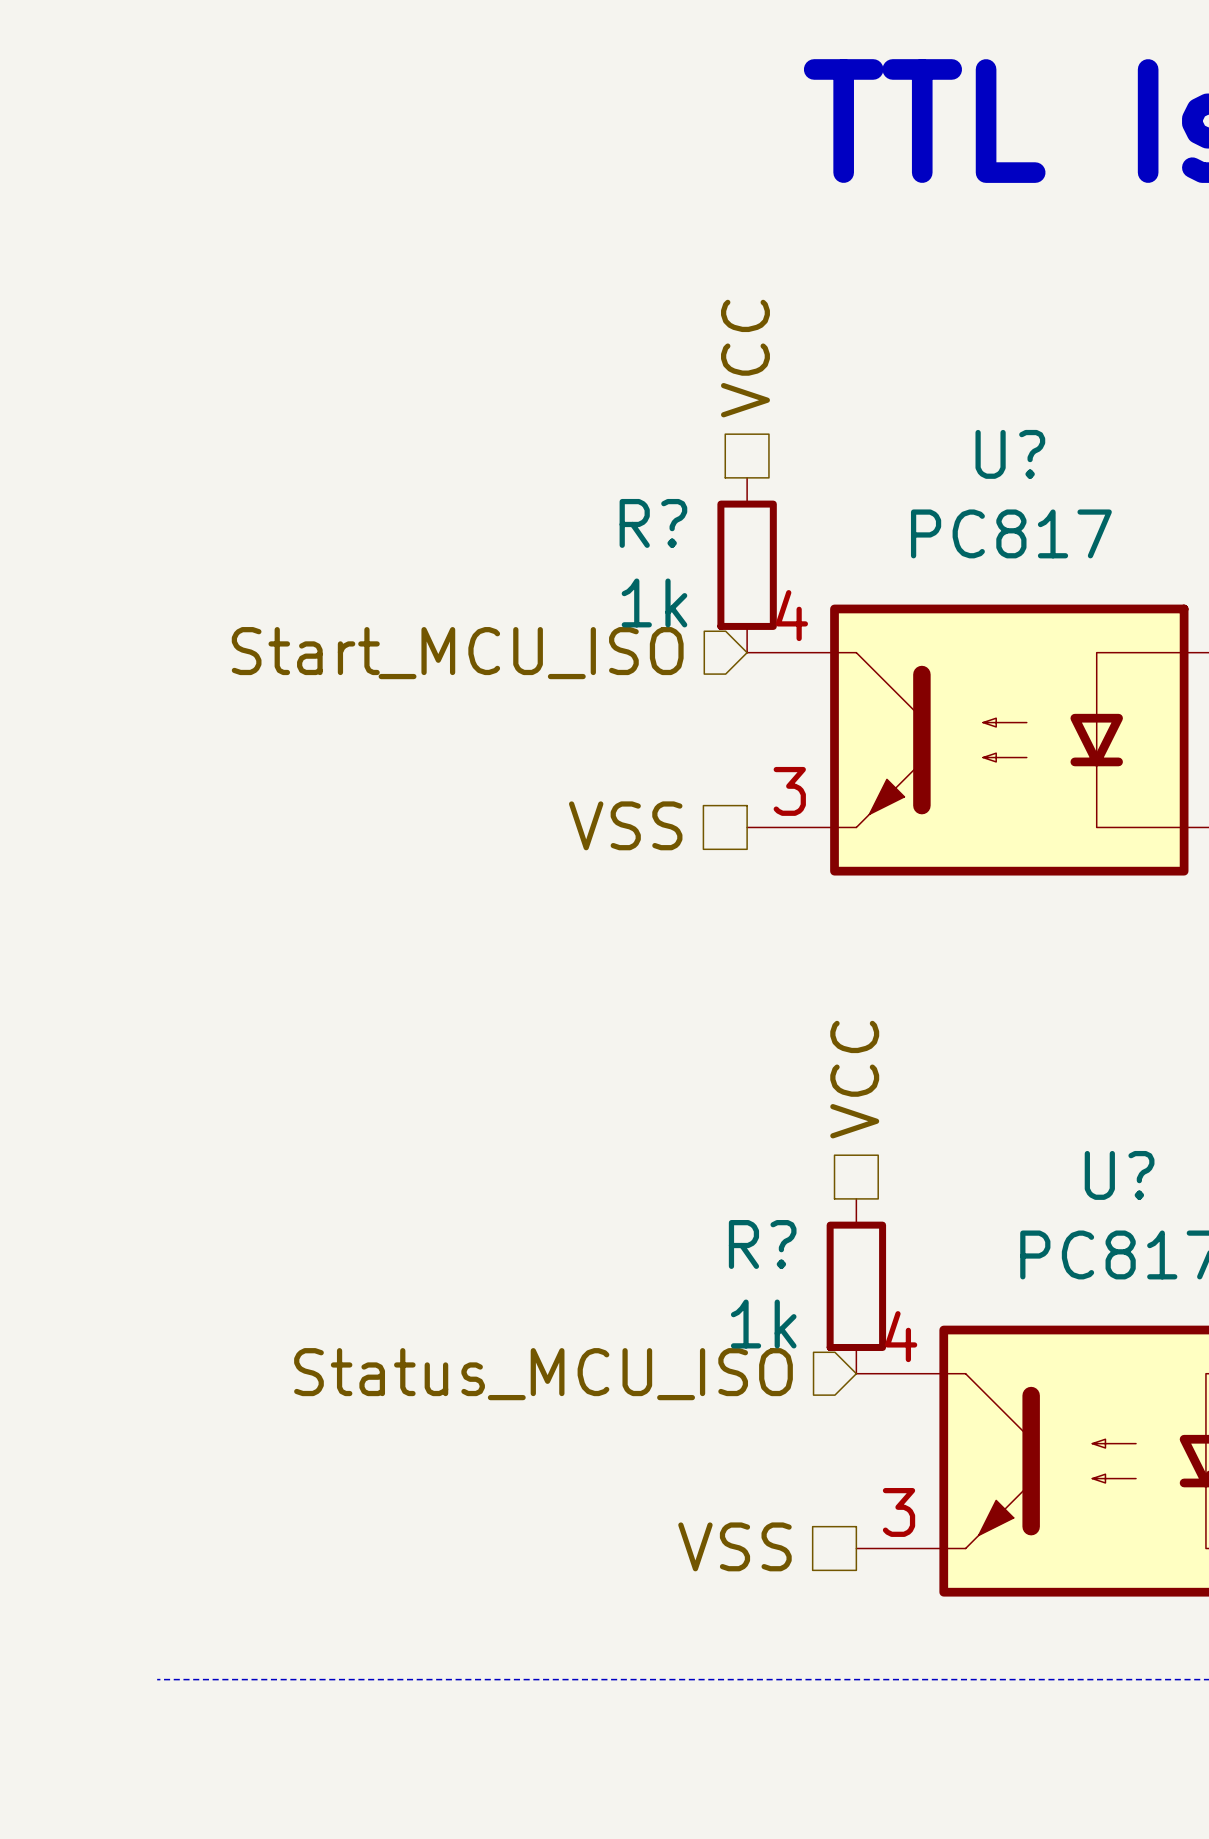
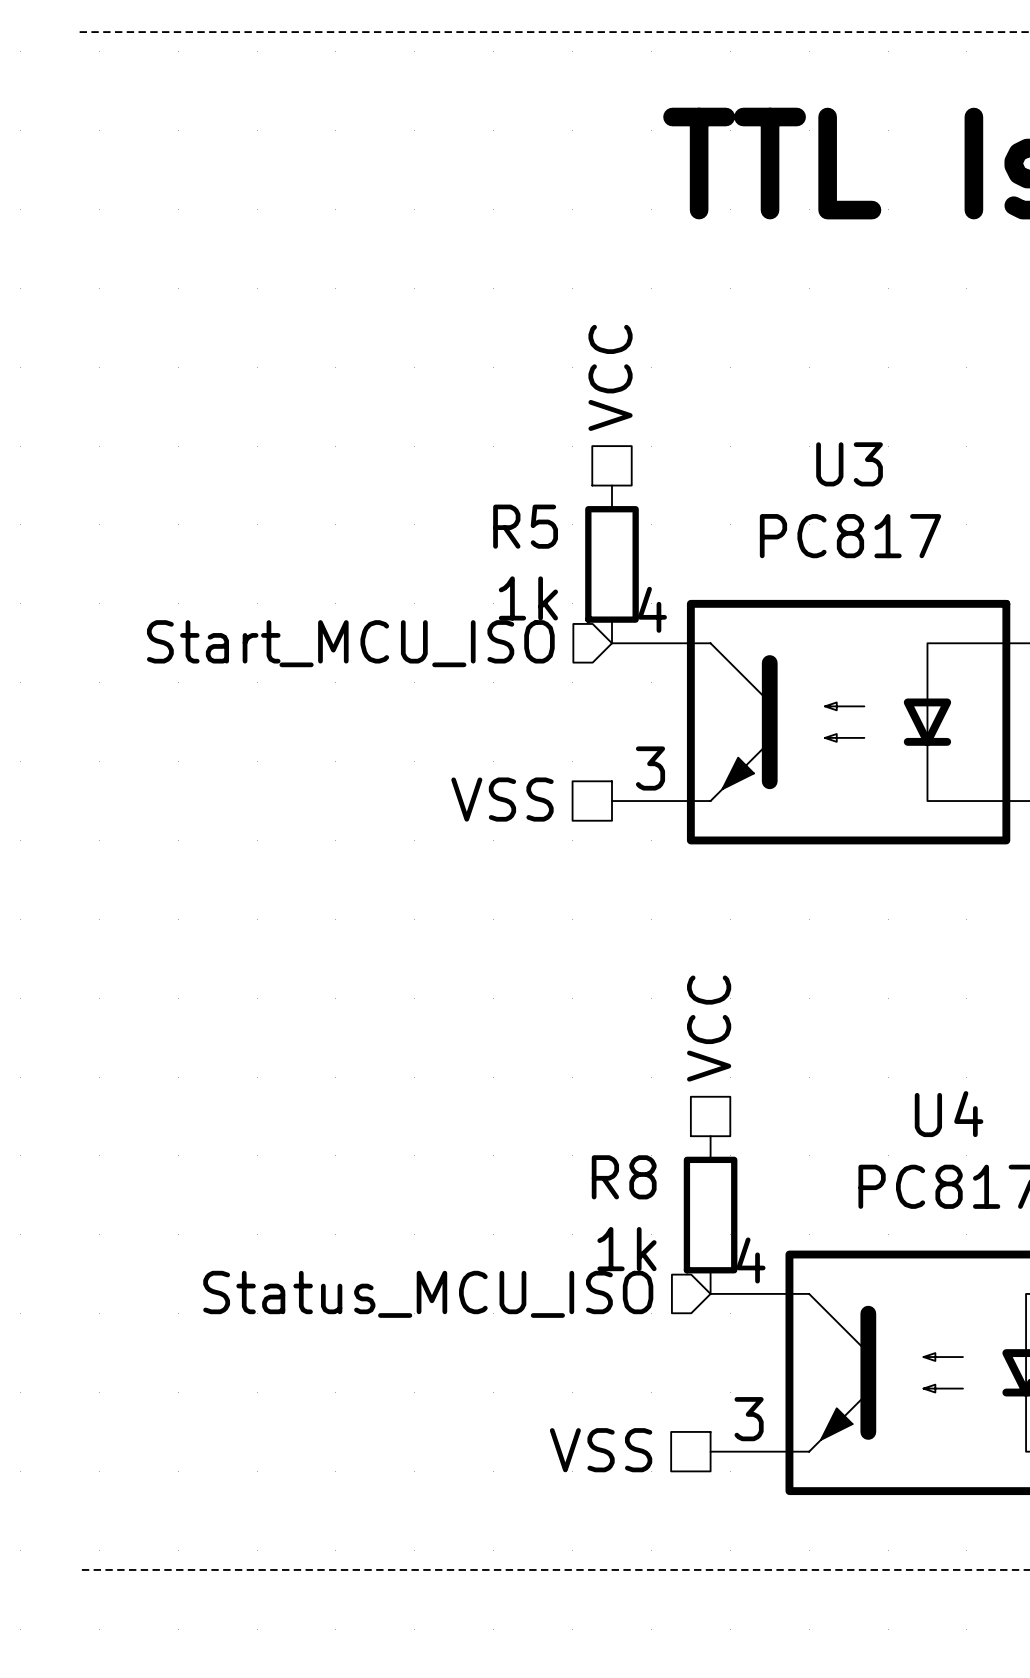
U? name: U? (1010, 454) -> U3 (849, 464)
R? name: R? (653, 523) -> R5 (525, 526)
U? name: U? (1119, 1175) -> U4 (949, 1114)
R? name: R? (762, 1244) -> R8 (624, 1177)

